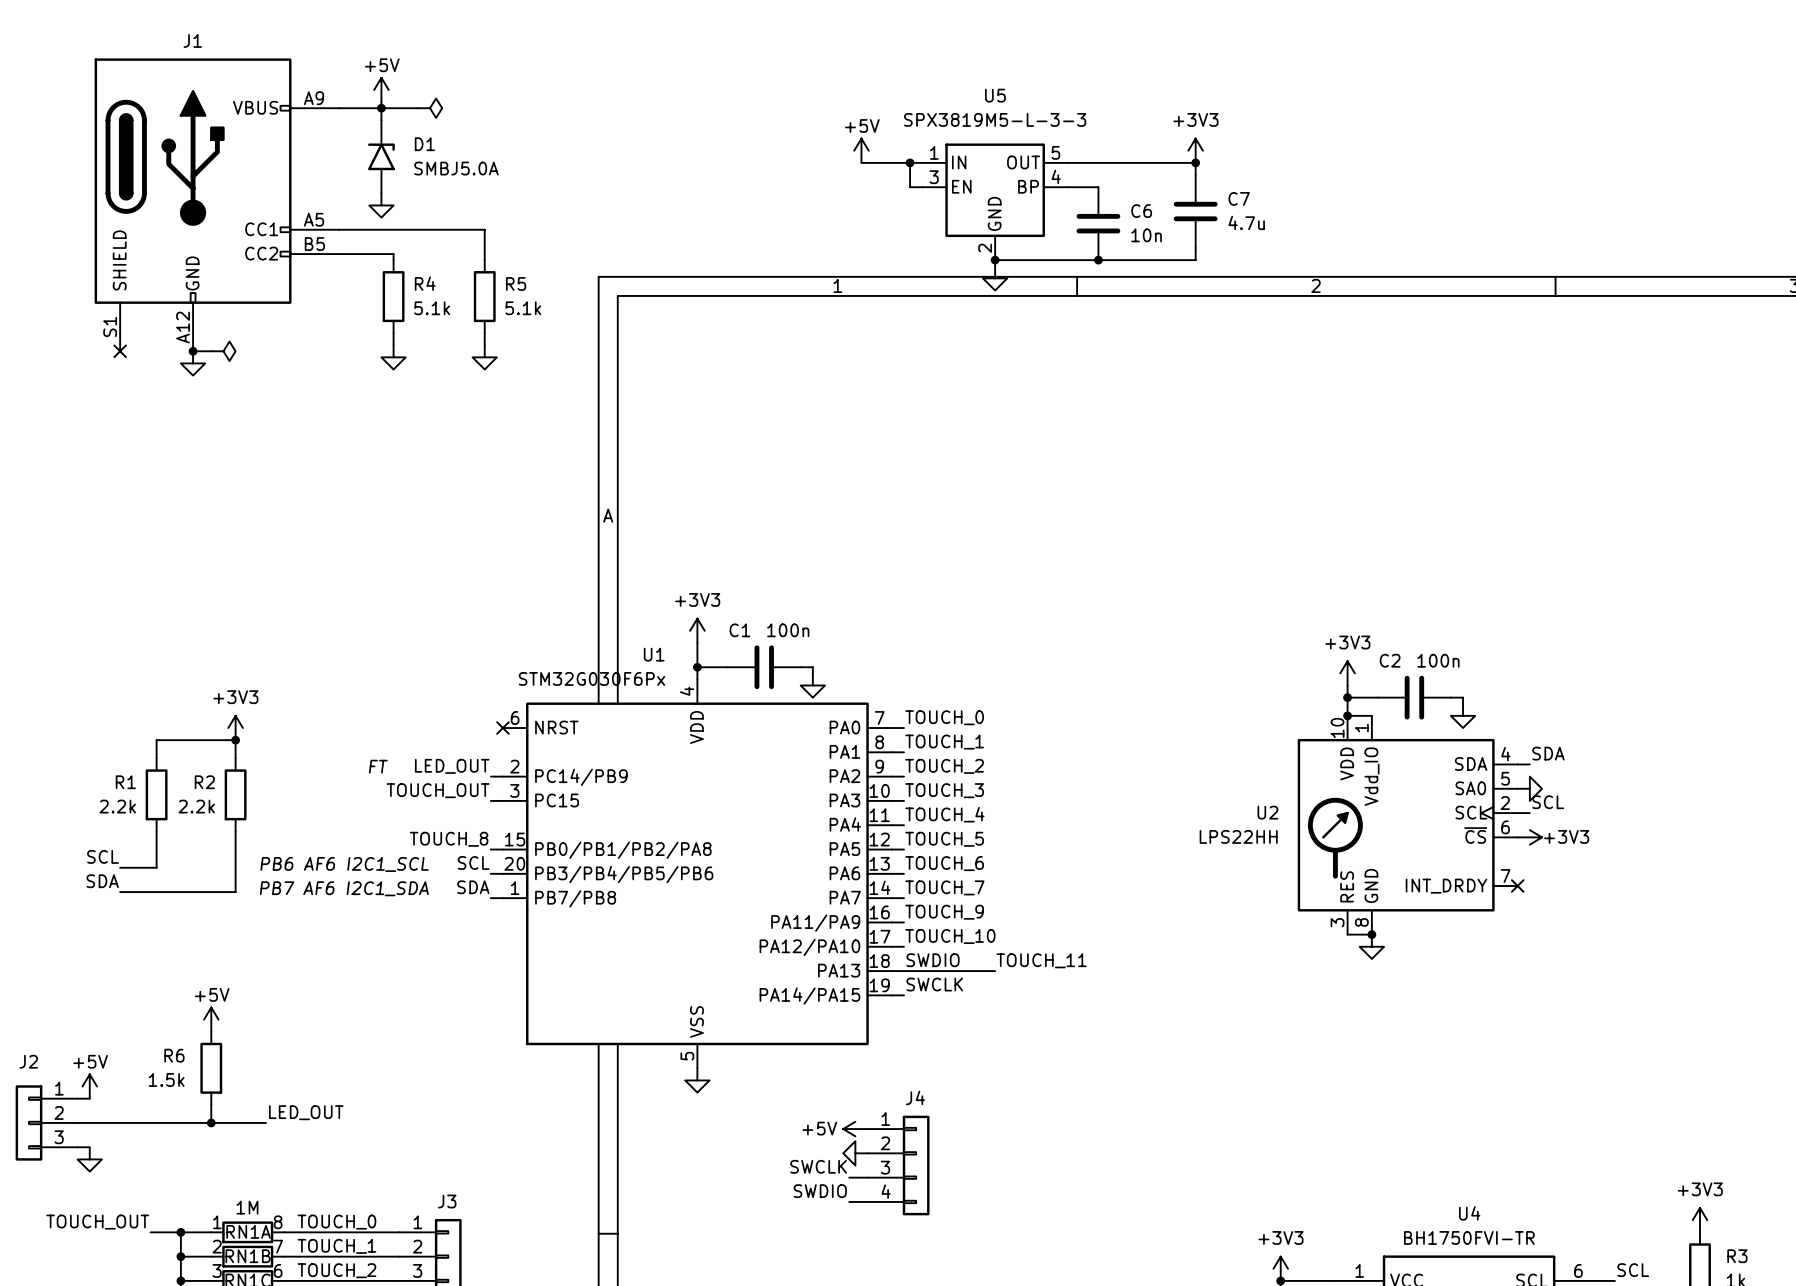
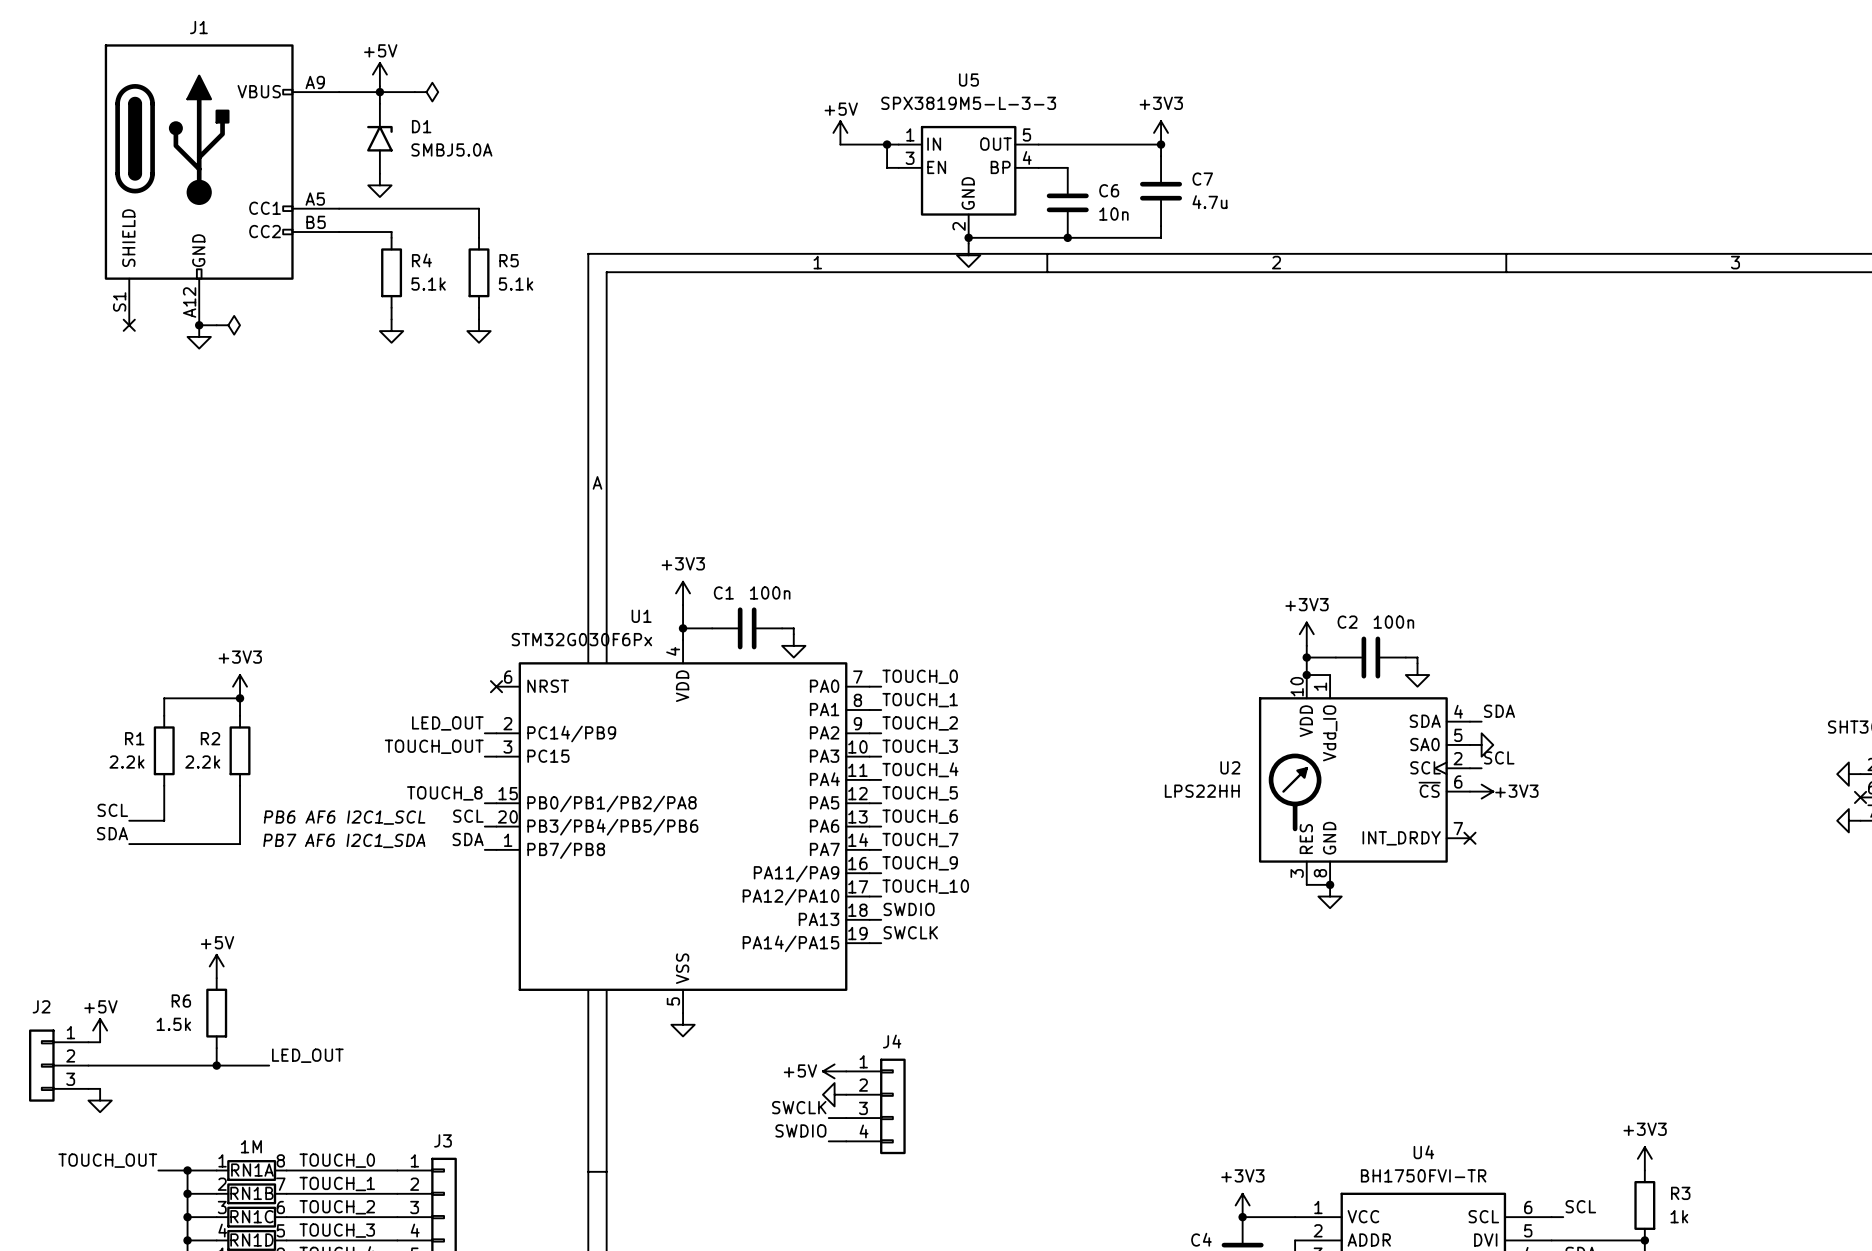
text: FT (378, 766) -> none
label: TOUCH_11 (1041, 960) -> none
wire: (904, 971) (995, 971) -> none

